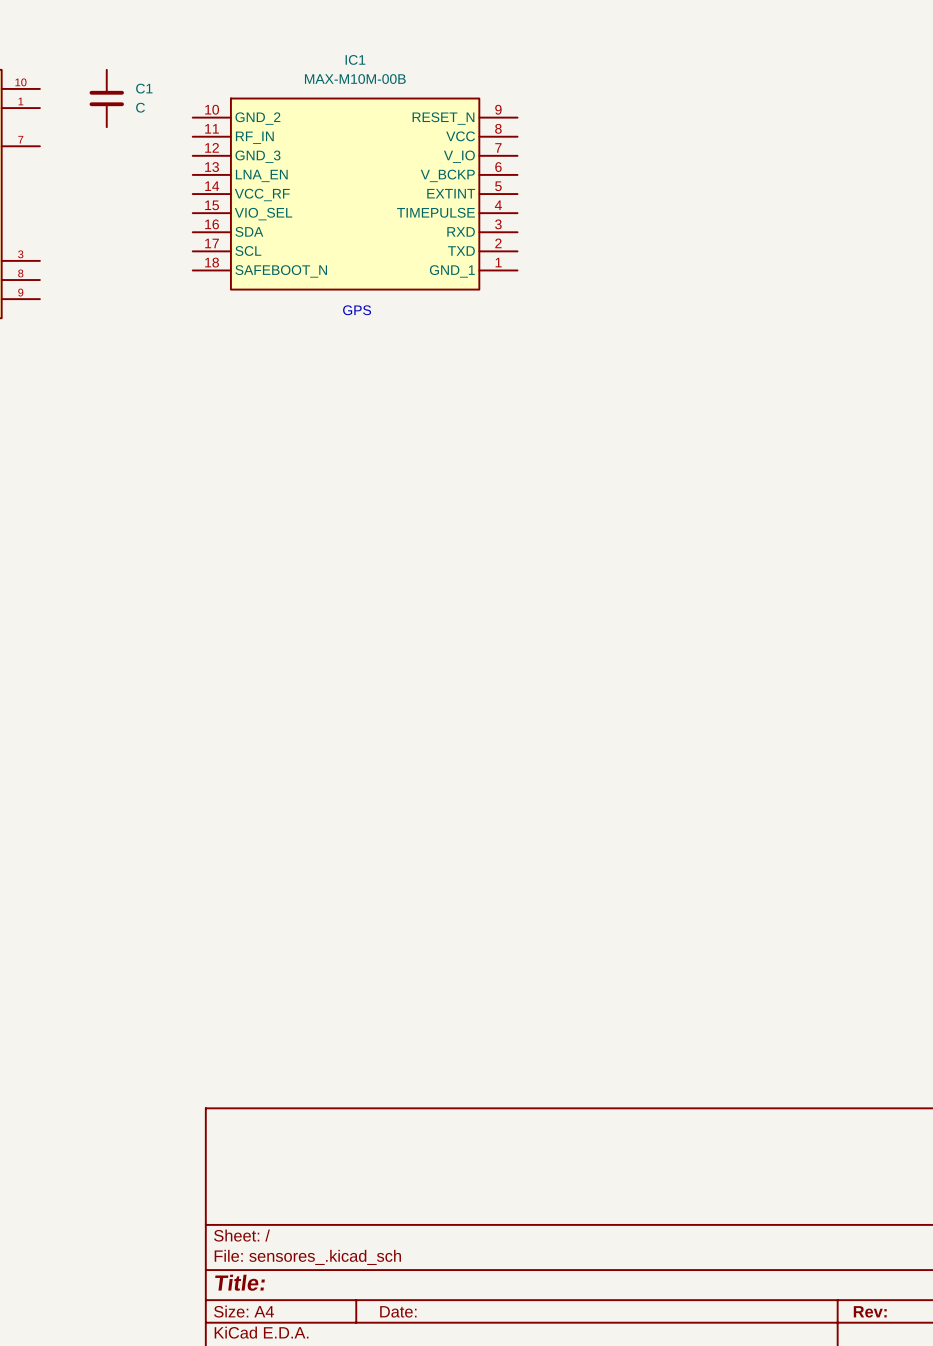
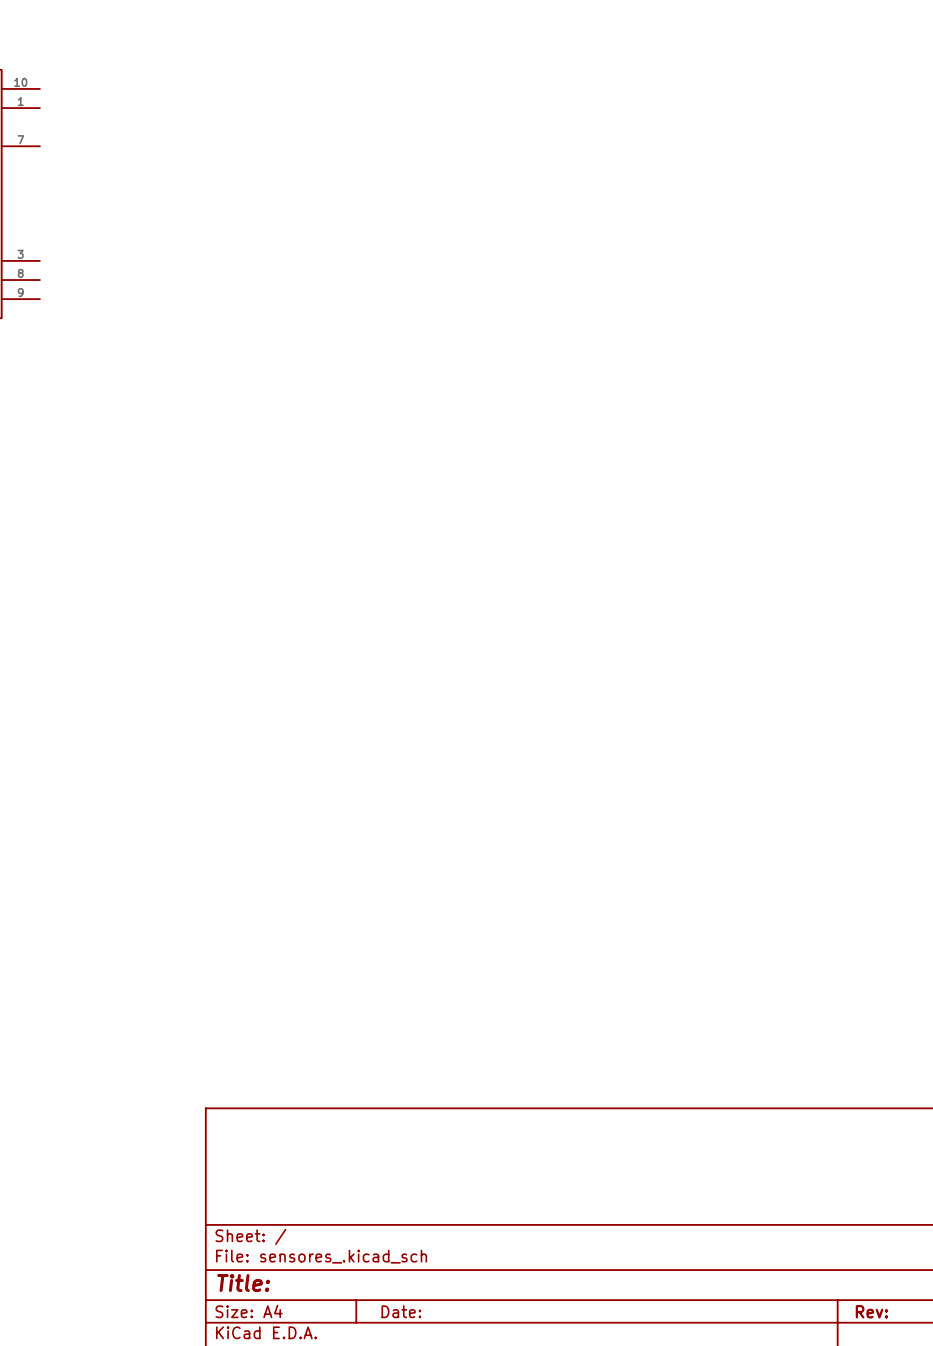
C1: C (106, 98) -> none
IC1: MAX-M10M-00B (355, 194) -> none
text: GPS (357, 310) -> none

